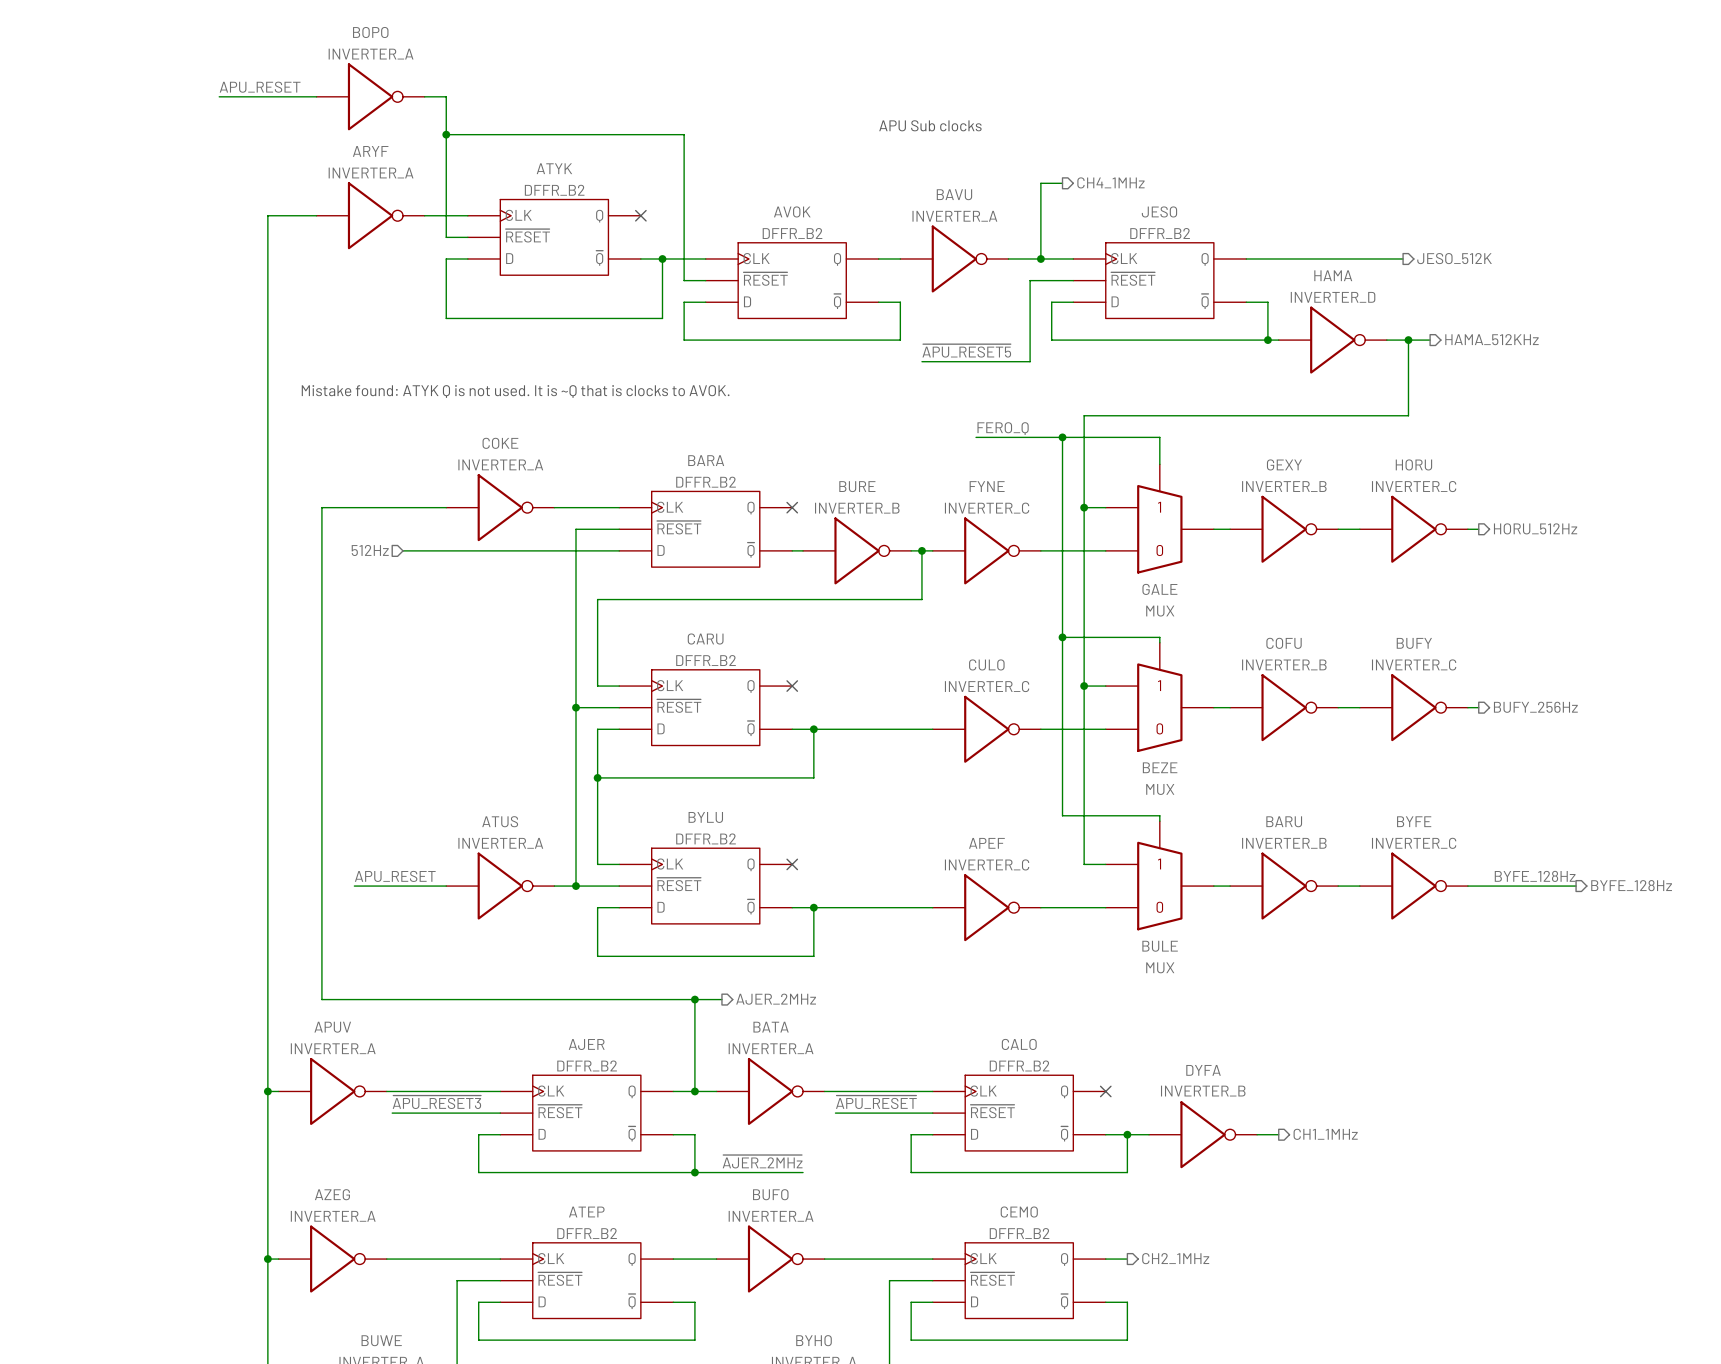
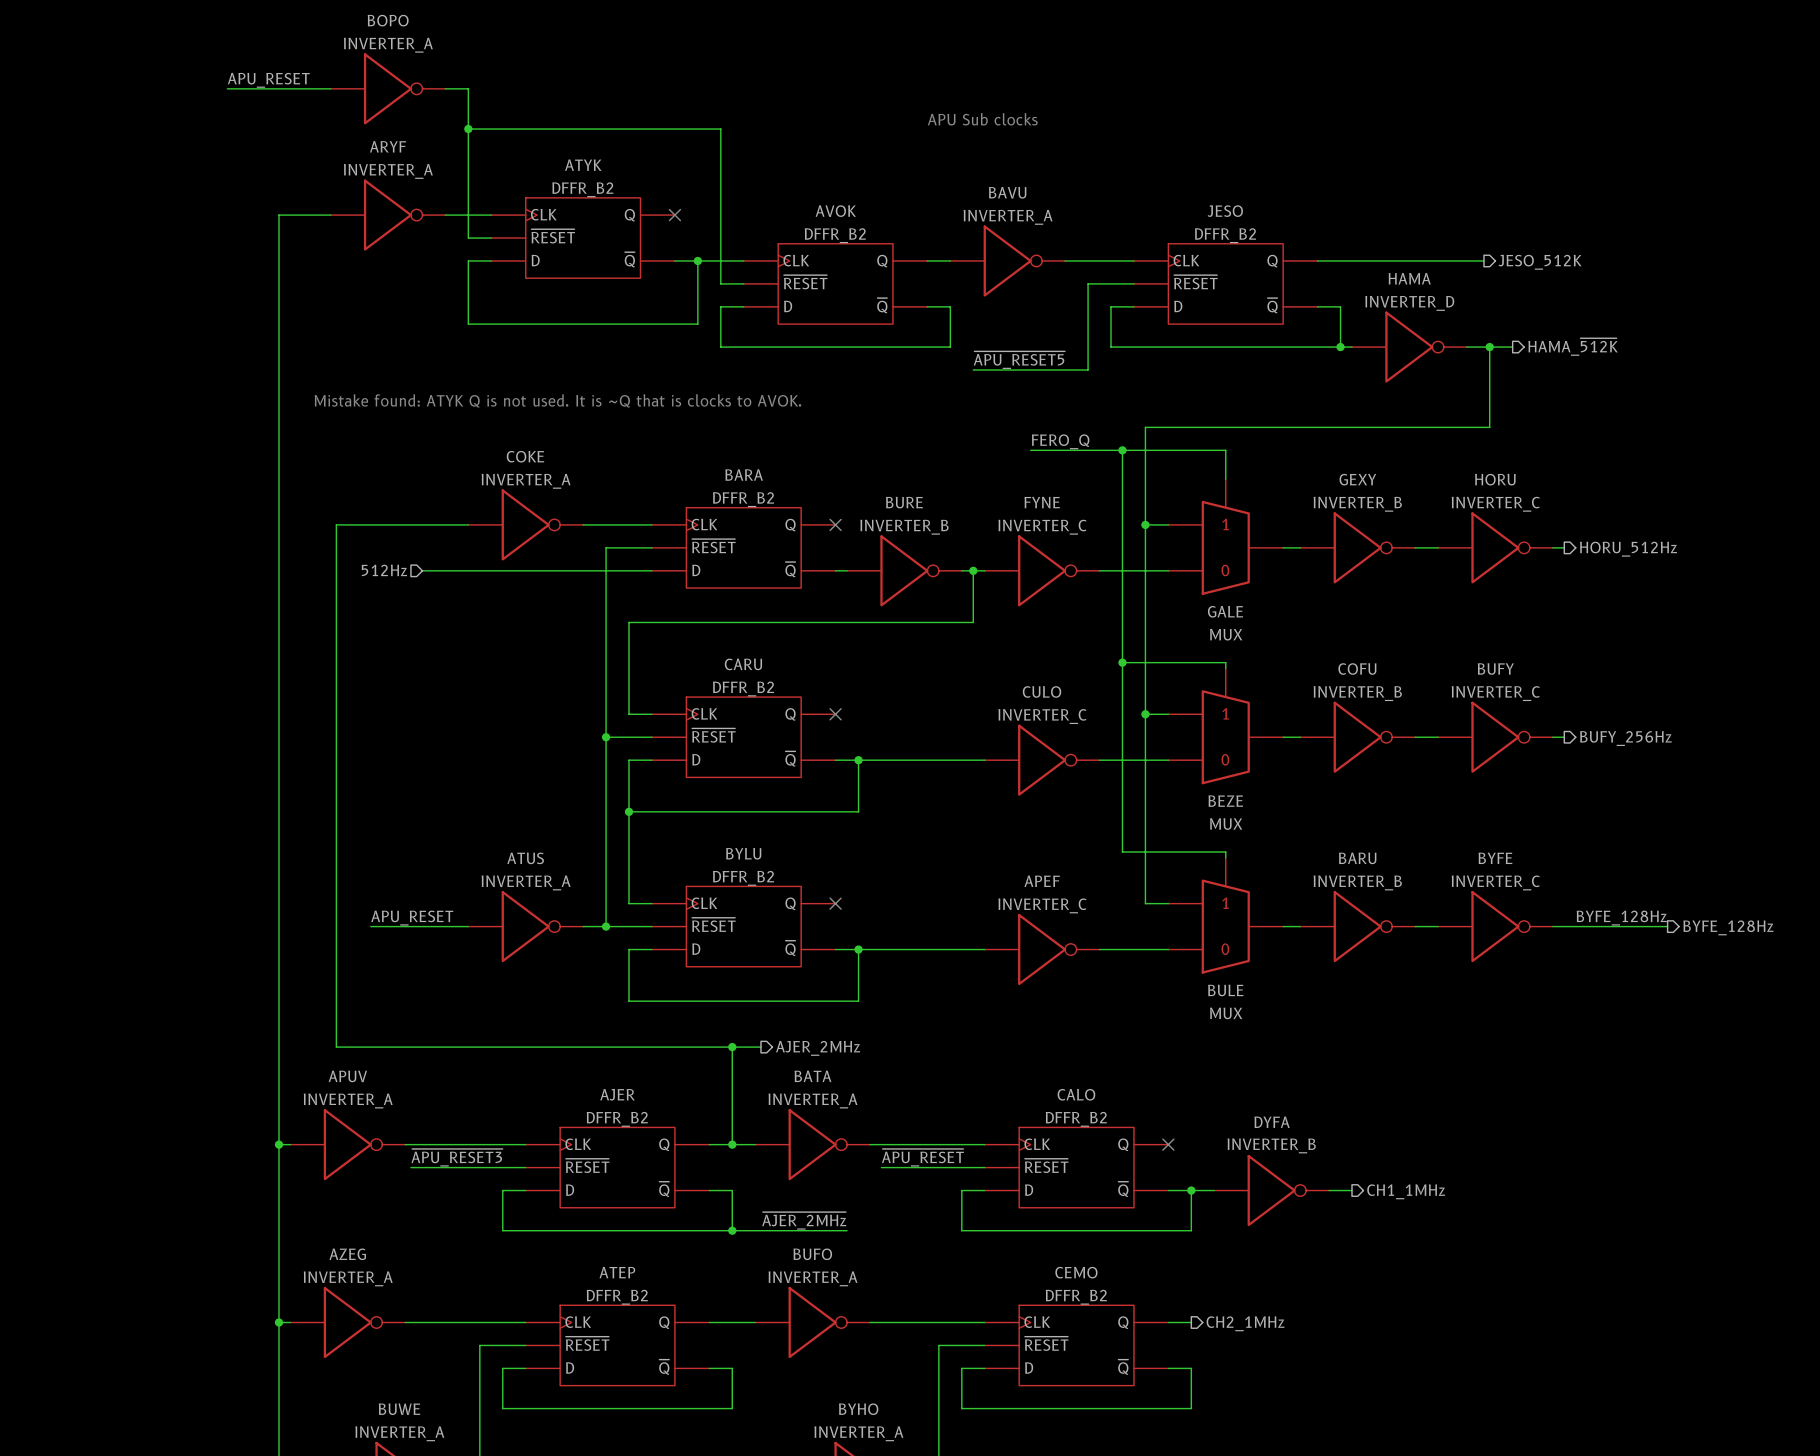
hierarchical label: CH4_1MHz (1110, 182) -> none
wire: (1062, 183) (1040, 183) (1040, 258) -> none
junction: (1040, 258) -> none
hierarchical label: HAMA_512KHz (1491, 339) -> HAMA_~{512K} (1573, 347)

